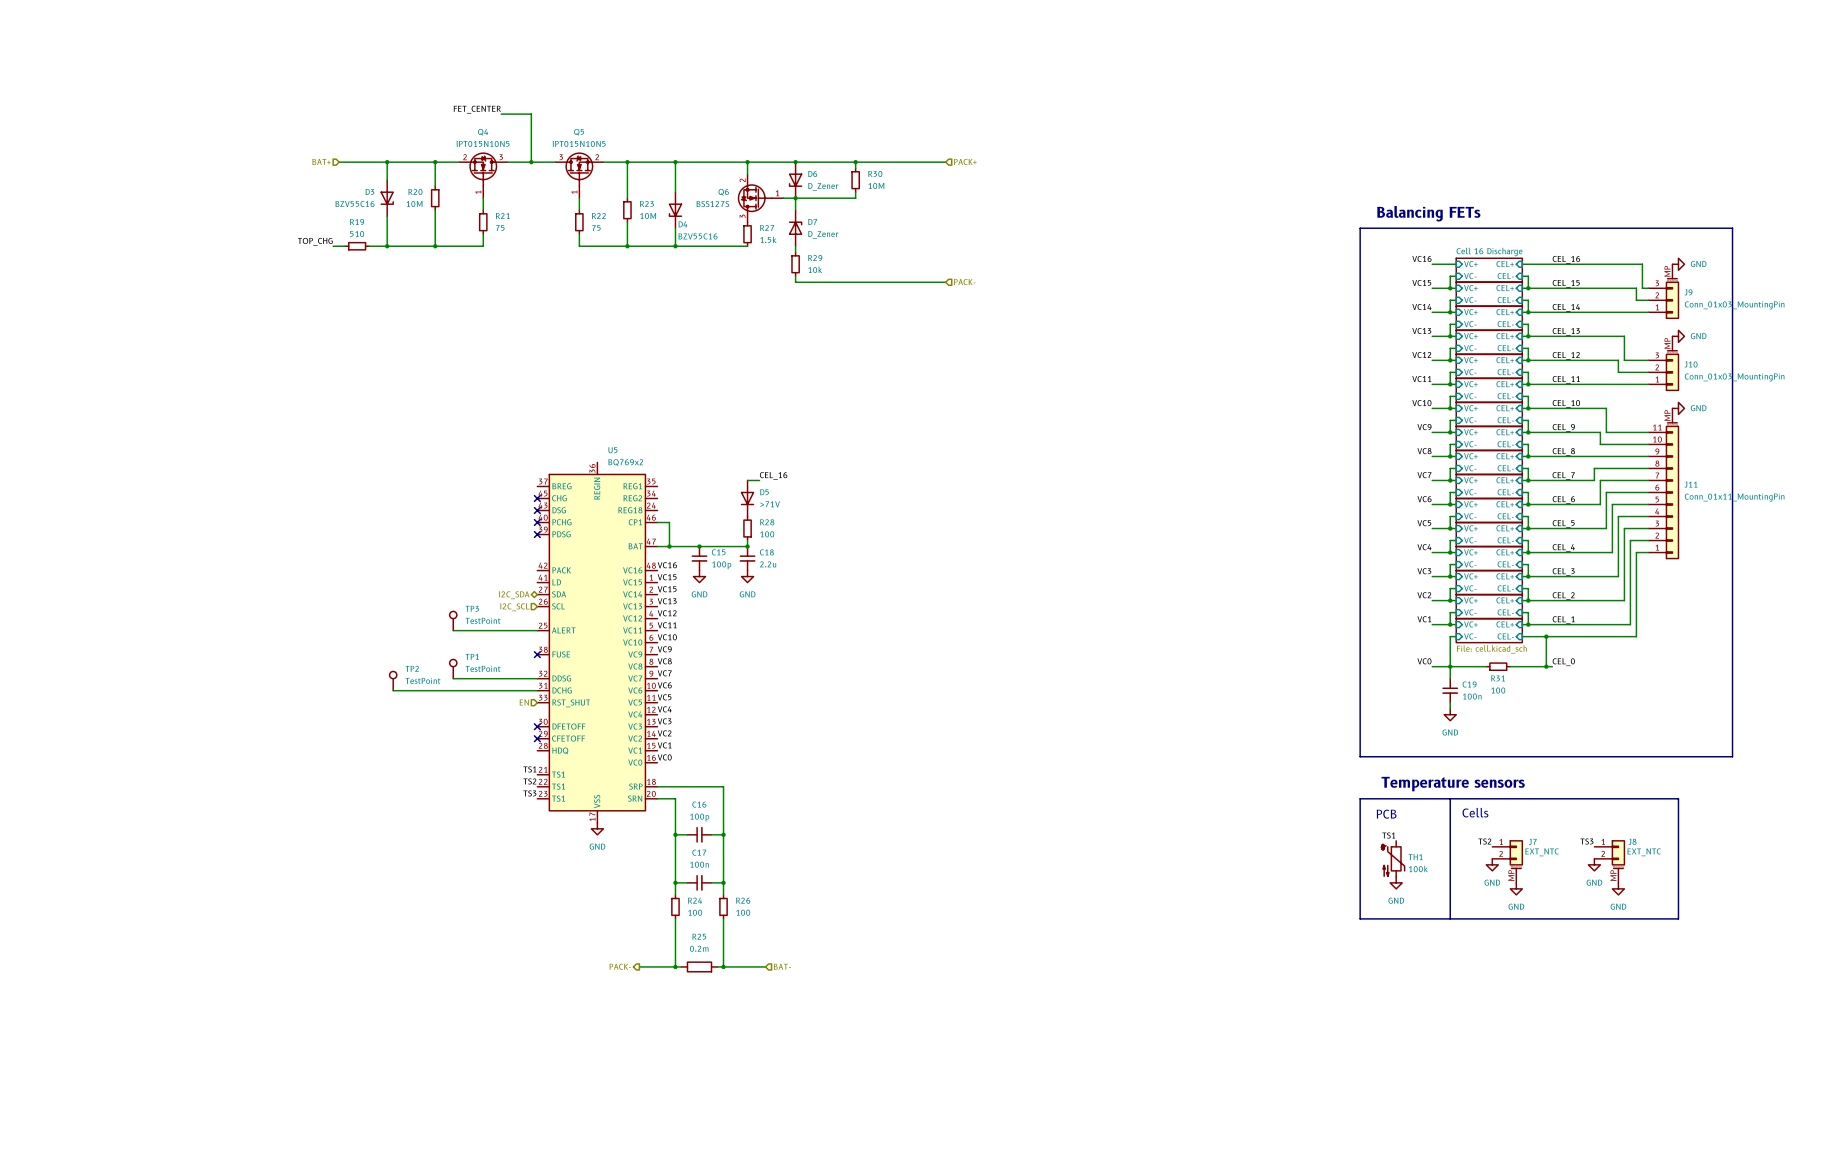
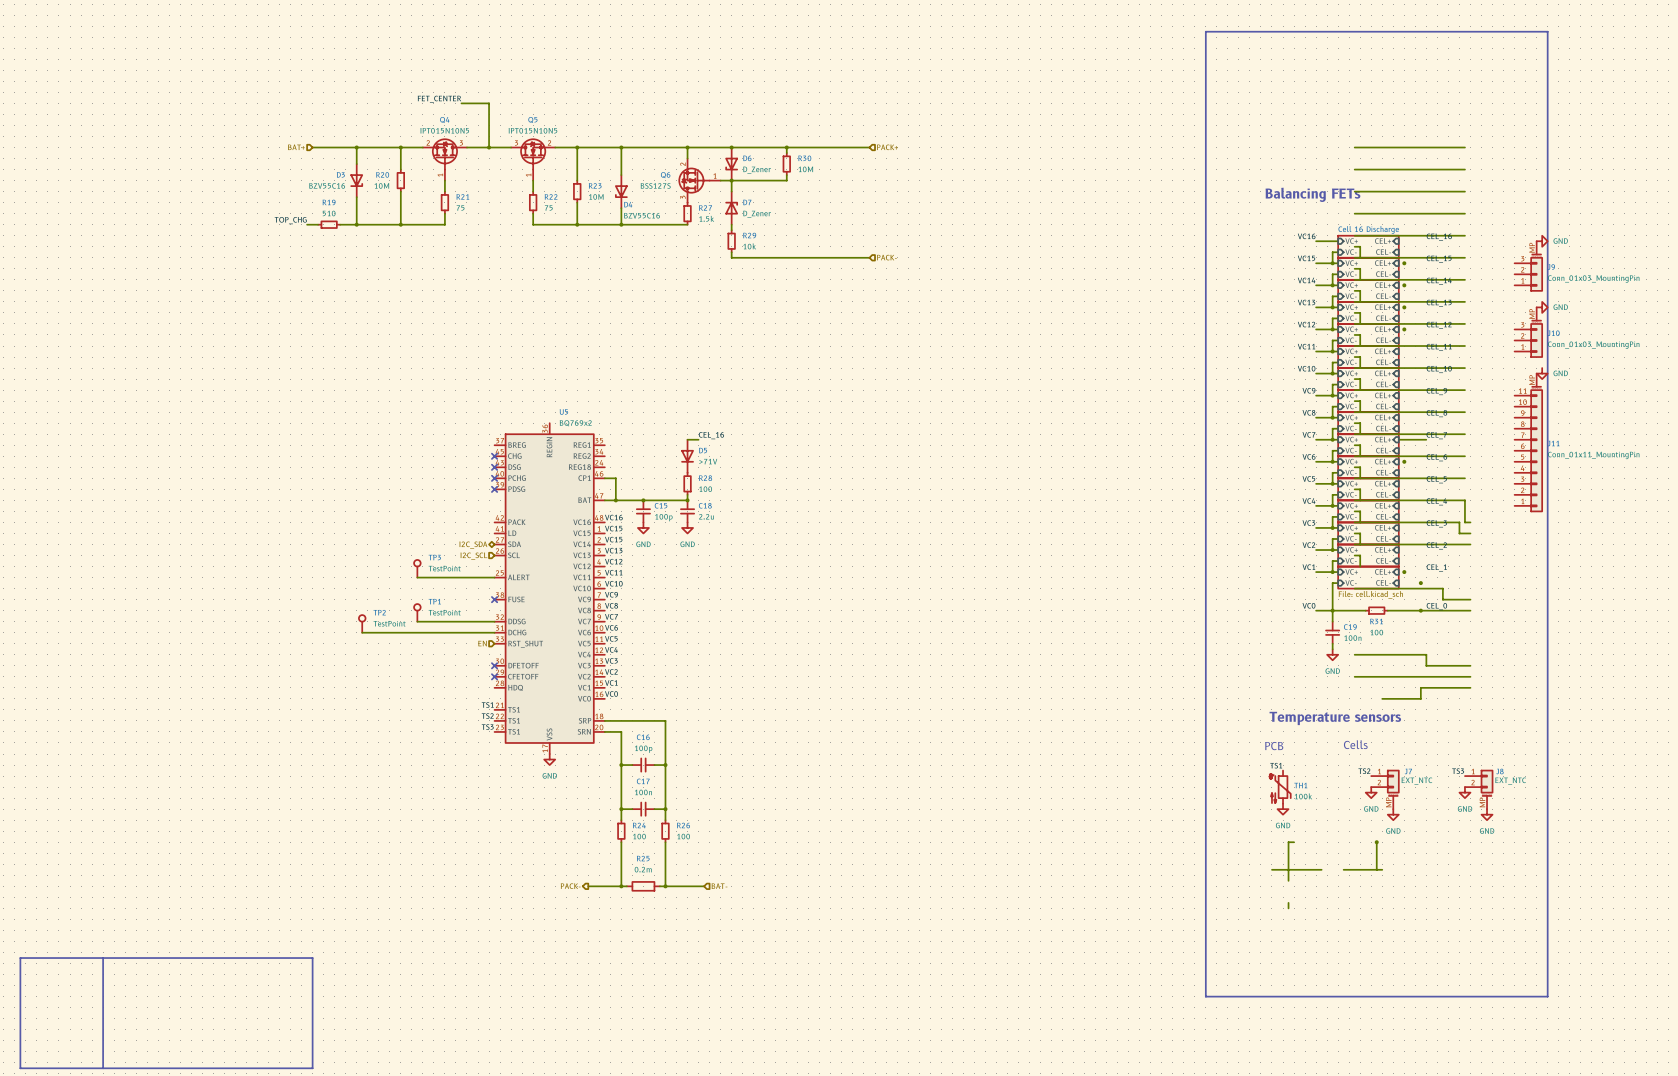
line: none -> (1205, 31) (1547, 31) (1547, 996) (1205, 996) (1205, 31)
wire: none -> (1354, 147) (1464, 147)
wire: none -> (1354, 169) (1464, 169)
wire: none -> (1354, 191) (1464, 191)
line: (1360, 228) (1360, 756) (1732, 756) (1732, 228) (1360, 228) -> none
wire: none -> (1354, 213) (1464, 213)
wire: none -> (1354, 235) (1464, 235)
wire: (1522, 264) (1642, 264) (1642, 288) (1648, 288) -> none
wire: (1522, 276) (1528, 276) (1528, 288) -> (1354, 246) (1360, 246) (1360, 257)
wire: none -> (1354, 257) (1464, 257)
wire: (1522, 288) (1636, 288) (1636, 300) (1648, 300) -> none
wire: (1522, 300) (1528, 300) (1528, 312) -> (1354, 268) (1360, 268) (1360, 279)
wire: none -> (1354, 279) (1464, 279)
wire: (1522, 312) (1648, 312) -> none
wire: (1522, 324) (1528, 324) (1528, 336) -> (1354, 290) (1360, 290) (1360, 301)
wire: none -> (1354, 301) (1464, 301)
wire: (1522, 336) (1624, 336) (1624, 360) (1648, 360) -> none
wire: (1522, 348) (1528, 348) (1528, 360) -> (1354, 312) (1360, 312) (1360, 323)
wire: none -> (1354, 323) (1464, 323)
wire: (1522, 360) (1618, 360) (1618, 372) (1648, 372) -> none
wire: (1522, 372) (1528, 372) (1528, 384) -> (1354, 334) (1360, 334) (1360, 346)
wire: none -> (1354, 346) (1464, 346)
wire: (1522, 384) (1648, 384) -> none
junction: (1528, 384) -> none
wire: (1522, 396) (1528, 396) (1528, 408) -> (1354, 357) (1360, 357) (1360, 368)
wire: none -> (1354, 368) (1464, 368)
wire: (1522, 408) (1606, 408) (1606, 432) (1648, 432) -> none
junction: (1528, 408) -> none
power symbol rotation: 0° (1678, 408) -> 90° clockwise (1542, 373)
wire: (1522, 420) (1528, 420) (1528, 432) -> (1354, 379) (1360, 379) (1360, 390)
wire: none -> (1354, 390) (1464, 390)
wire: (1522, 432) (1600, 432) (1600, 444) (1648, 444) -> none
junction: (1528, 432) -> none
wire: (1522, 444) (1528, 444) (1528, 456) -> (1354, 401) (1360, 401) (1360, 412)
wire: none -> (1354, 412) (1464, 412)
wire: (1522, 456) (1648, 456) -> none
junction: (1528, 456) -> none
wire: (1522, 468) (1528, 468) (1528, 480) -> (1354, 423) (1360, 423) (1360, 434)
wire: (1648, 468) (1594, 468) (1594, 480) (1552, 480) -> none
wire: none -> (1354, 434) (1464, 434)
junction: (1528, 480) -> none
wire: (1648, 480) (1600, 480) (1600, 504) (1522, 504) -> none
wire: (1522, 492) (1528, 492) (1528, 504) -> (1354, 445) (1360, 445) (1360, 456)
wire: (1648, 492) (1606, 492) (1606, 528) (1522, 528) -> none
wire: none -> (1354, 456) (1464, 456)
wire: (1648, 504) (1612, 504) (1612, 552) (1522, 552) -> none
wire: (1522, 516) (1528, 516) (1528, 528) -> (1354, 467) (1360, 467) (1360, 478)
wire: (1648, 516) (1618, 516) (1618, 576) (1522, 576) -> none
wire: none -> (1354, 478) (1464, 478)
junction: (1528, 528) -> none
wire: (1648, 528) (1624, 528) (1624, 600) (1522, 600) -> none
wire: (1522, 540) (1528, 540) (1528, 552) -> (1354, 489) (1360, 489) (1360, 500)
wire: (1648, 540) (1630, 540) (1630, 624) (1522, 624) -> none
wire: none -> (1354, 500) (1464, 500) (1464, 522) (1470, 522)
junction: (1528, 552) -> none
wire: (1648, 552) (1636, 552) (1636, 636) (1522, 636) -> none
wire: (1522, 564) (1528, 564) (1528, 576) -> (1354, 511) (1360, 511) (1360, 522)
wire: none -> (1354, 522) (1459, 522) (1459, 533) (1470, 533)
junction: (1528, 576) -> none
wire: (1522, 588) (1528, 588) (1528, 600) -> (1354, 533) (1360, 533) (1360, 544)
wire: none -> (1354, 544) (1470, 544)
junction: (1528, 600) -> none
wire: (1522, 612) (1528, 612) (1528, 624) -> (1354, 555) (1360, 555) (1360, 566)
wire: (1546, 636) (1546, 666) -> none
wire: none -> (1354, 588) (1442, 588) (1442, 599) (1470, 599)
wire: none -> (1426, 610) (1470, 610)
wire: none -> (1354, 654) (1426, 654) (1426, 665) (1470, 665)
wire: none -> (1354, 676) (1470, 676)
wire: none -> (1470, 687) (1420, 687) (1420, 698) (1382, 698)
line: (1360, 798) (1678, 798) (1678, 918) (1360, 918) (1360, 798) -> none
line: (1450, 798) (1450, 918) -> none
wire: none -> (1294, 842) (1288, 842) (1288, 880)
wire: none -> (1376, 842) (1376, 869)
junction: none -> (1376, 842)
wire: none -> (1271, 869) (1321, 869)
wire: none -> (1343, 869) (1382, 869)
wire: none -> (1288, 902) (1288, 908)
line: none -> (20, 958) (312, 958) (312, 1068) (20, 1068) (20, 958)
line: none -> (103, 958) (103, 1068)

